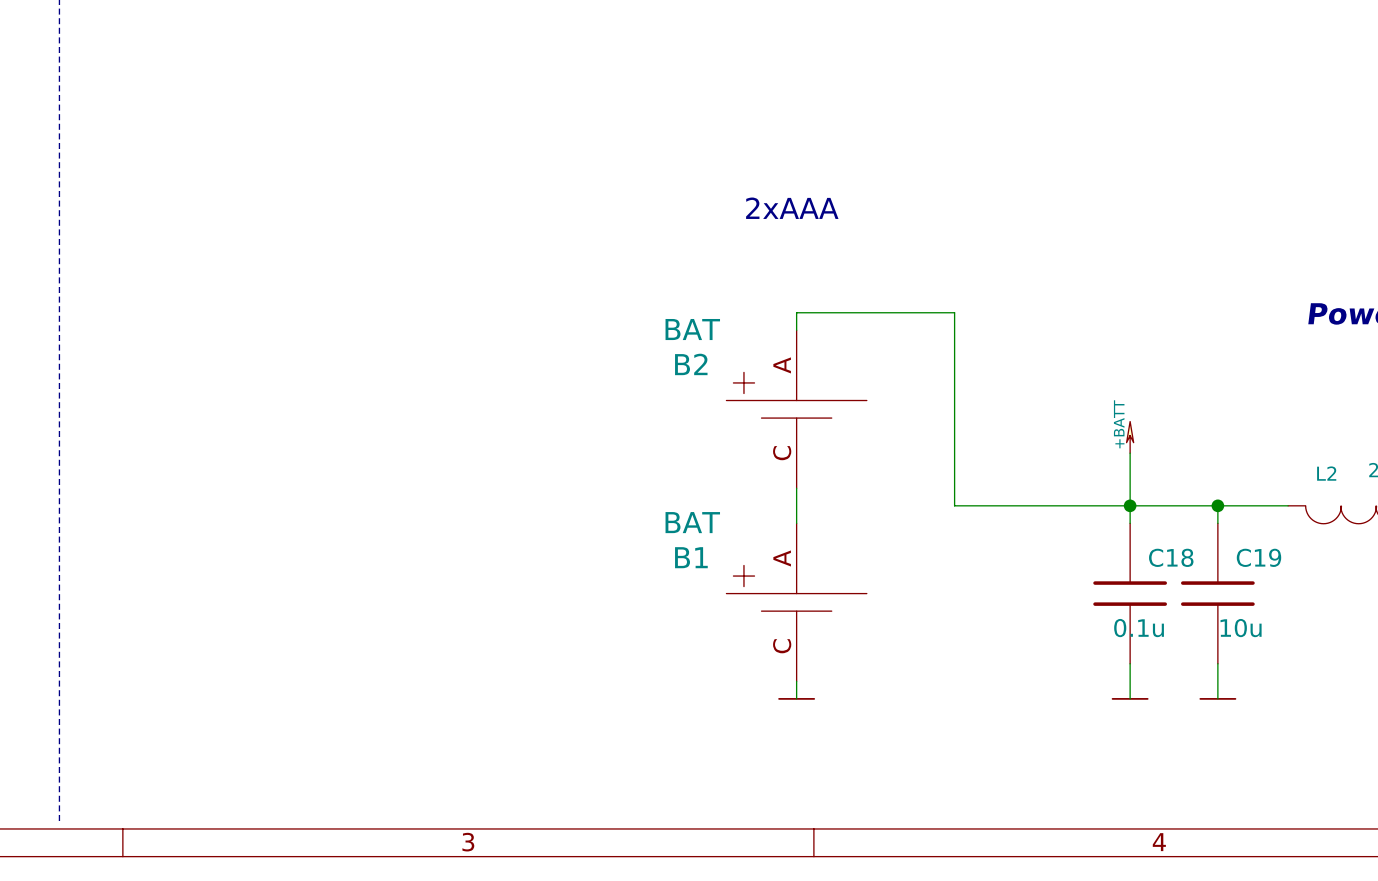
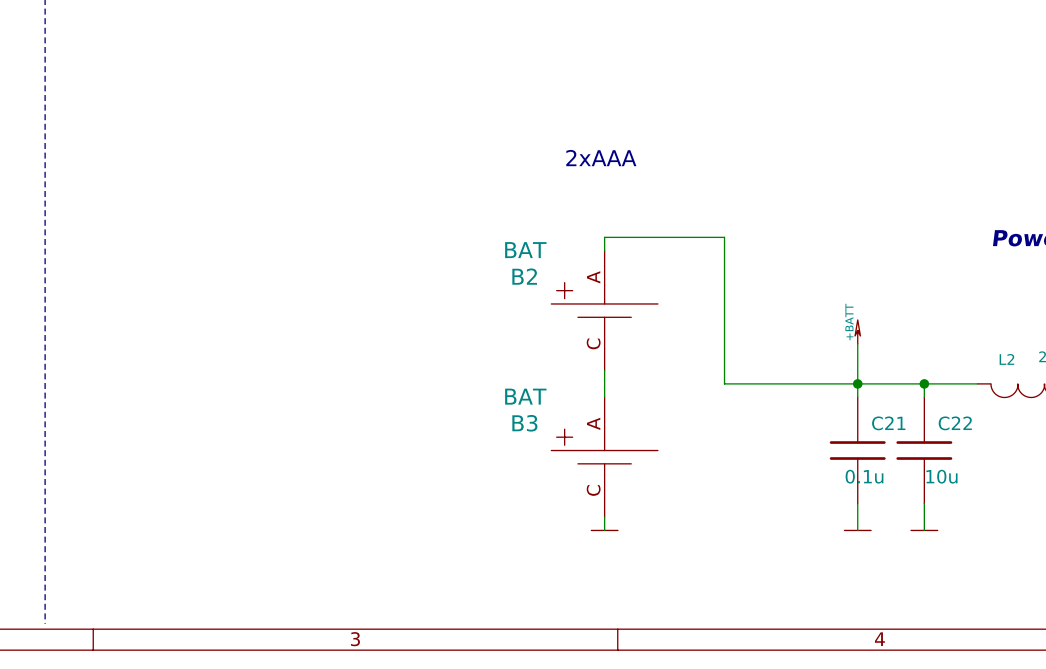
B1 name: B1 (691, 557) -> B3 (524, 423)
C18 name: C18 (1171, 557) -> C21 (888, 423)
C19 name: C19 (1258, 557) -> C22 (955, 423)

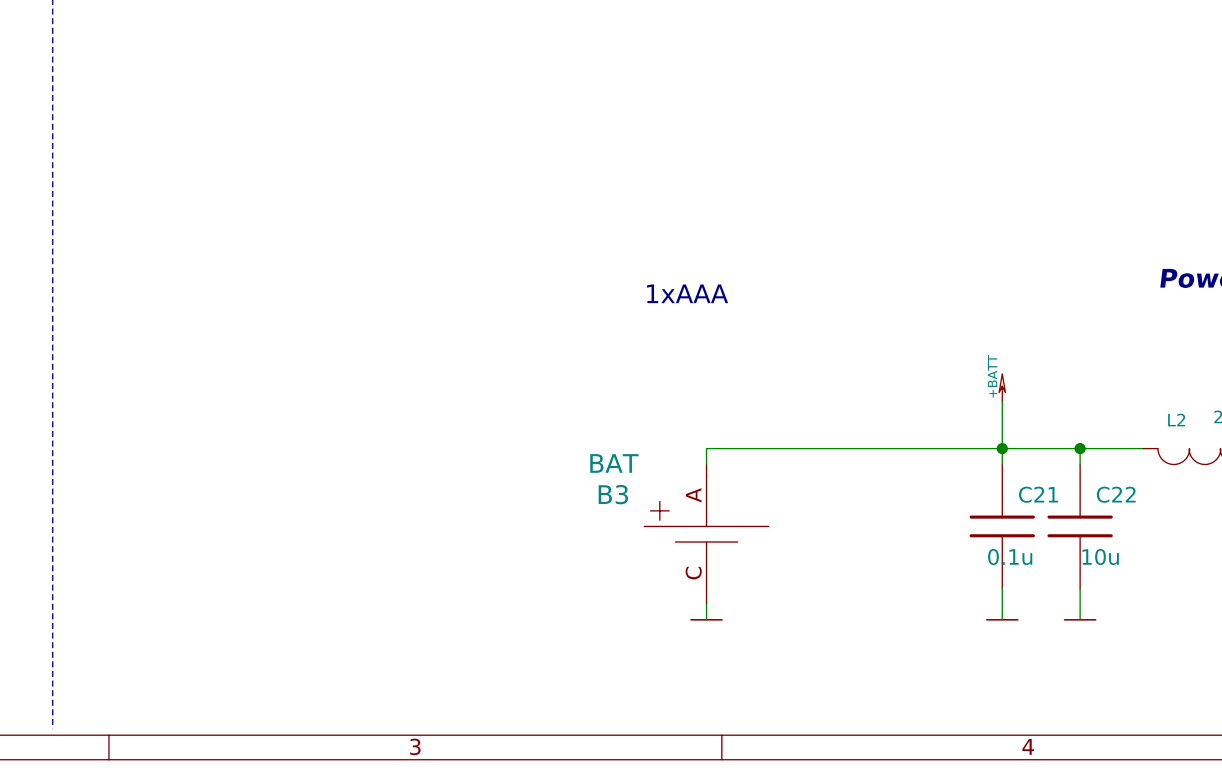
text: 2xAAA (601, 158) -> none
wire: (604, 250) (604, 237) (724, 237) (724, 383) -> none
text: none -> 1xAAA (687, 293)
B2: BAT (604, 310) -> none
wire: (604, 370) (604, 383) -> (846, 448) (706, 448)

